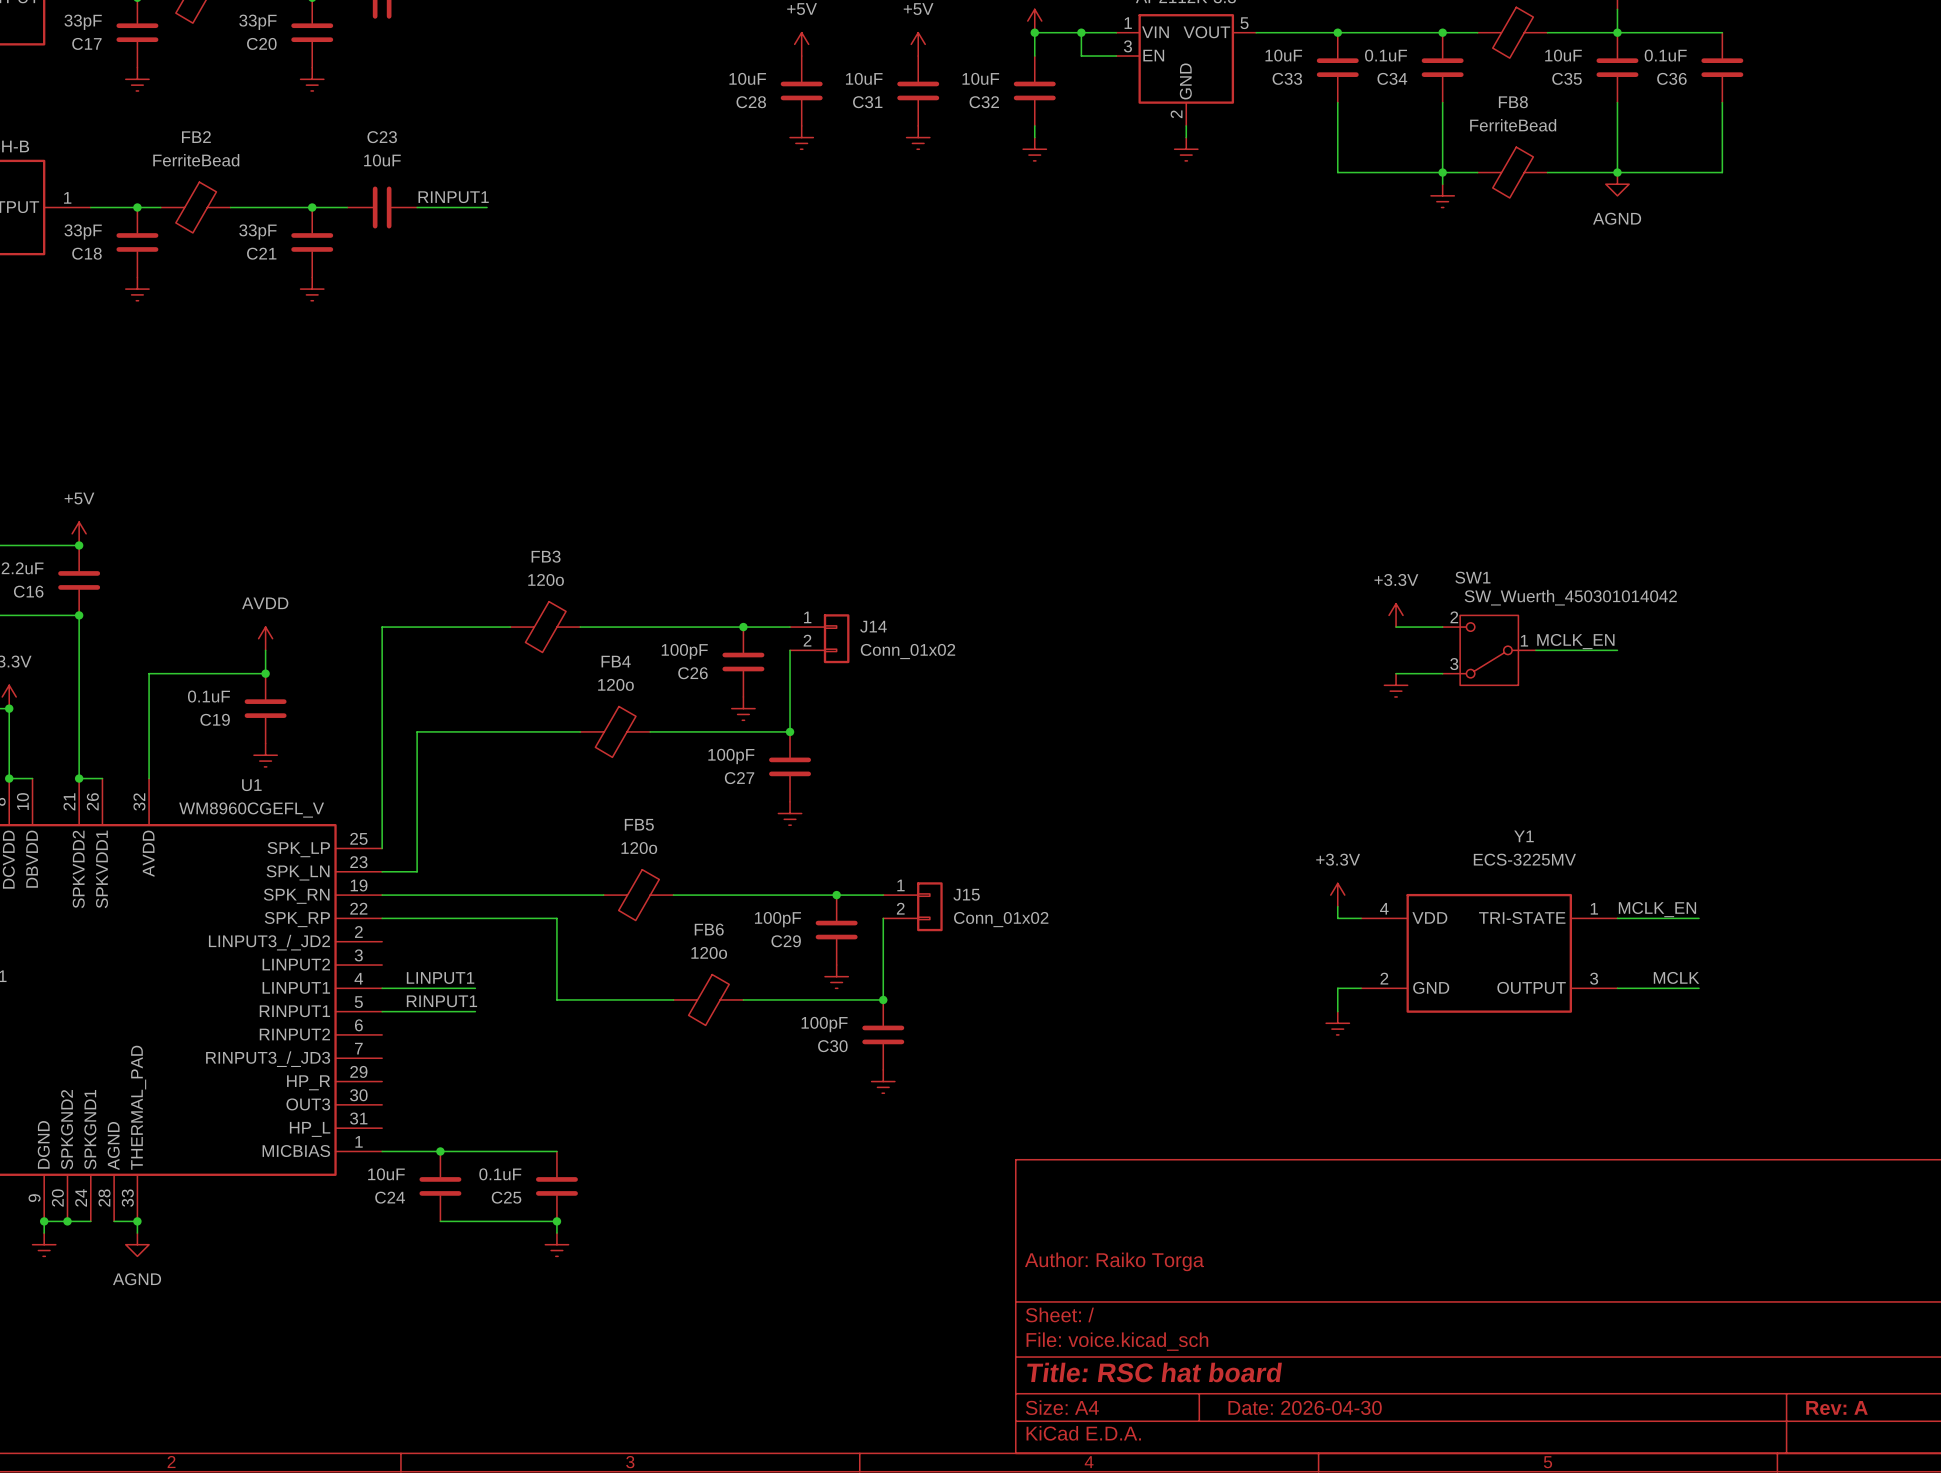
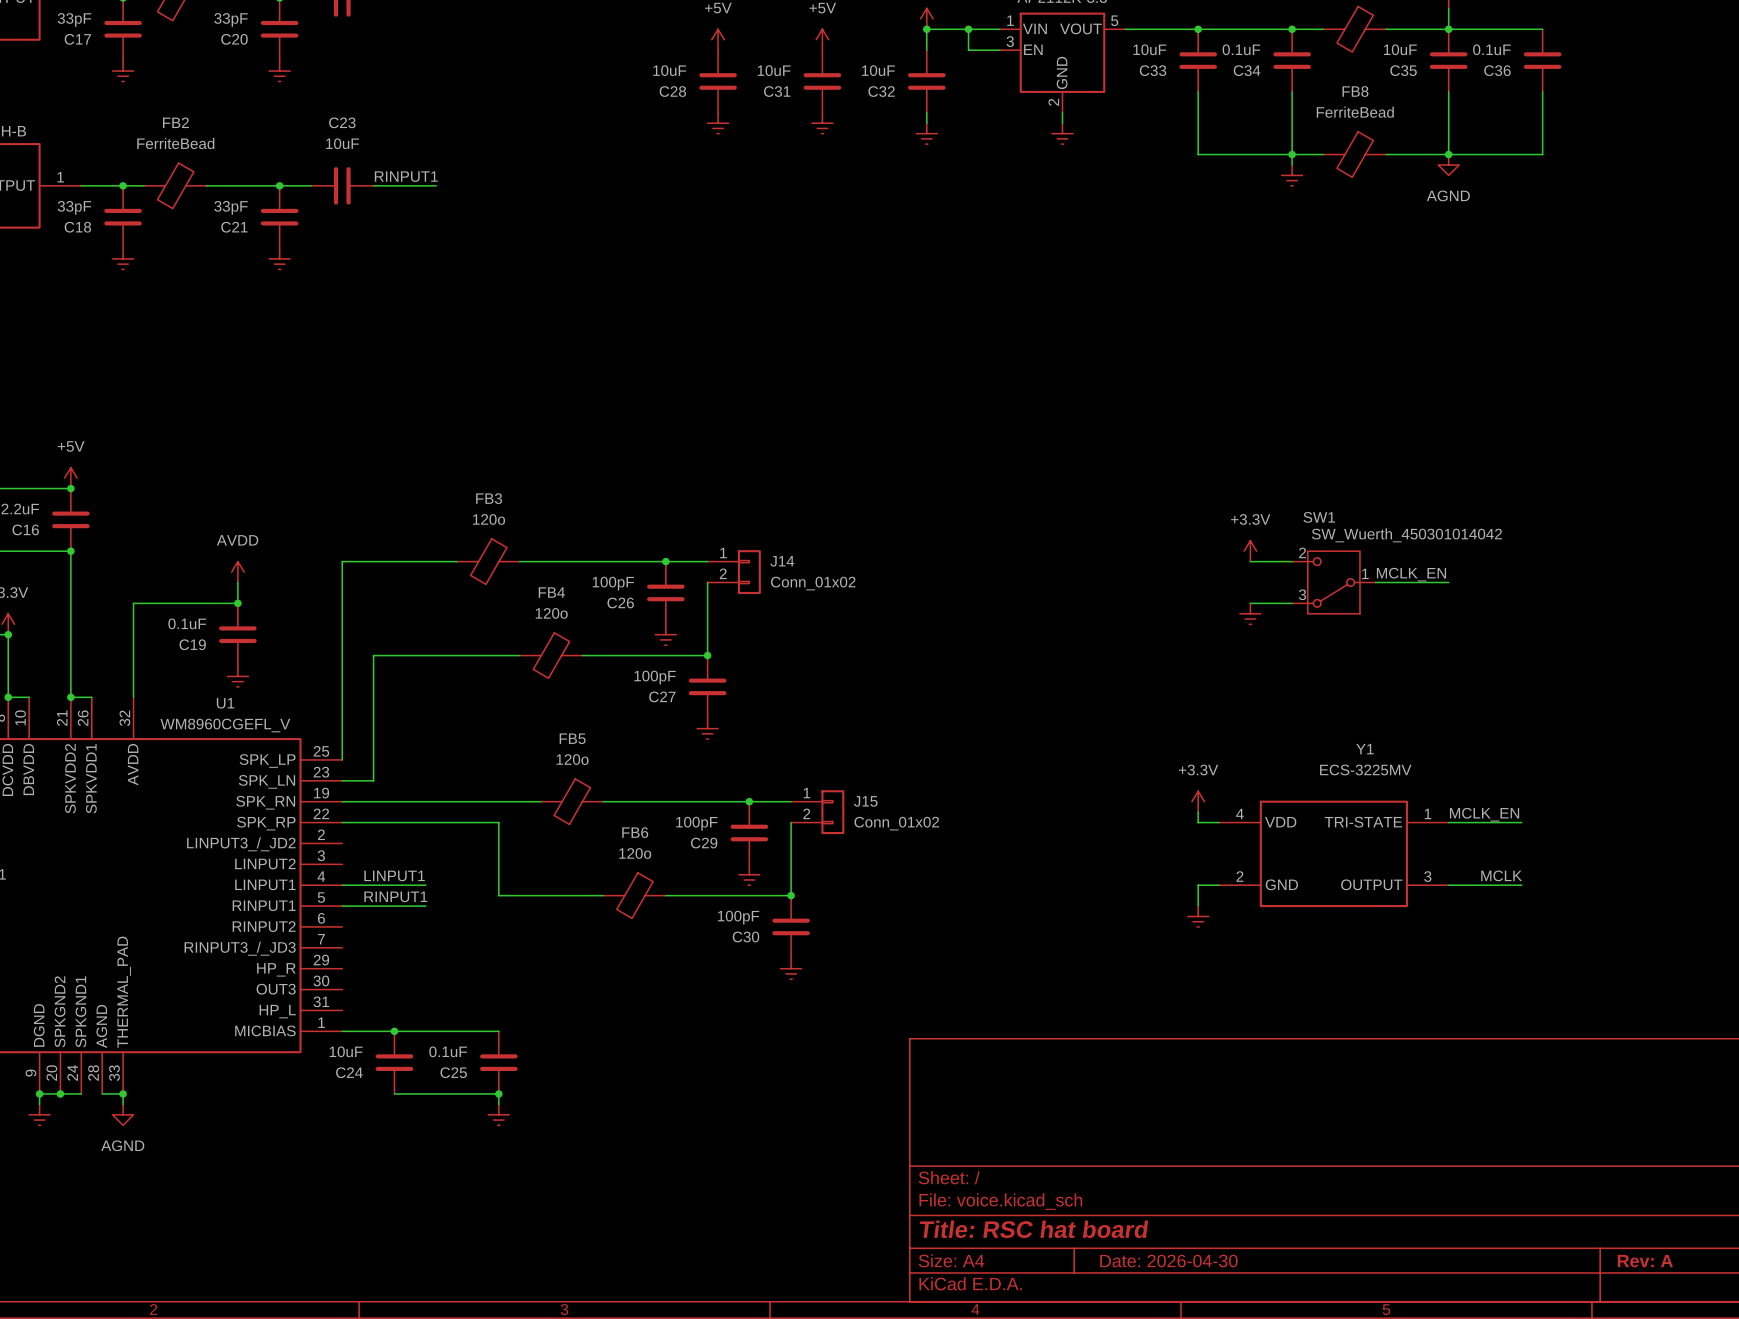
title block: Author: Raiko Torga (1114, 1261) -> none

